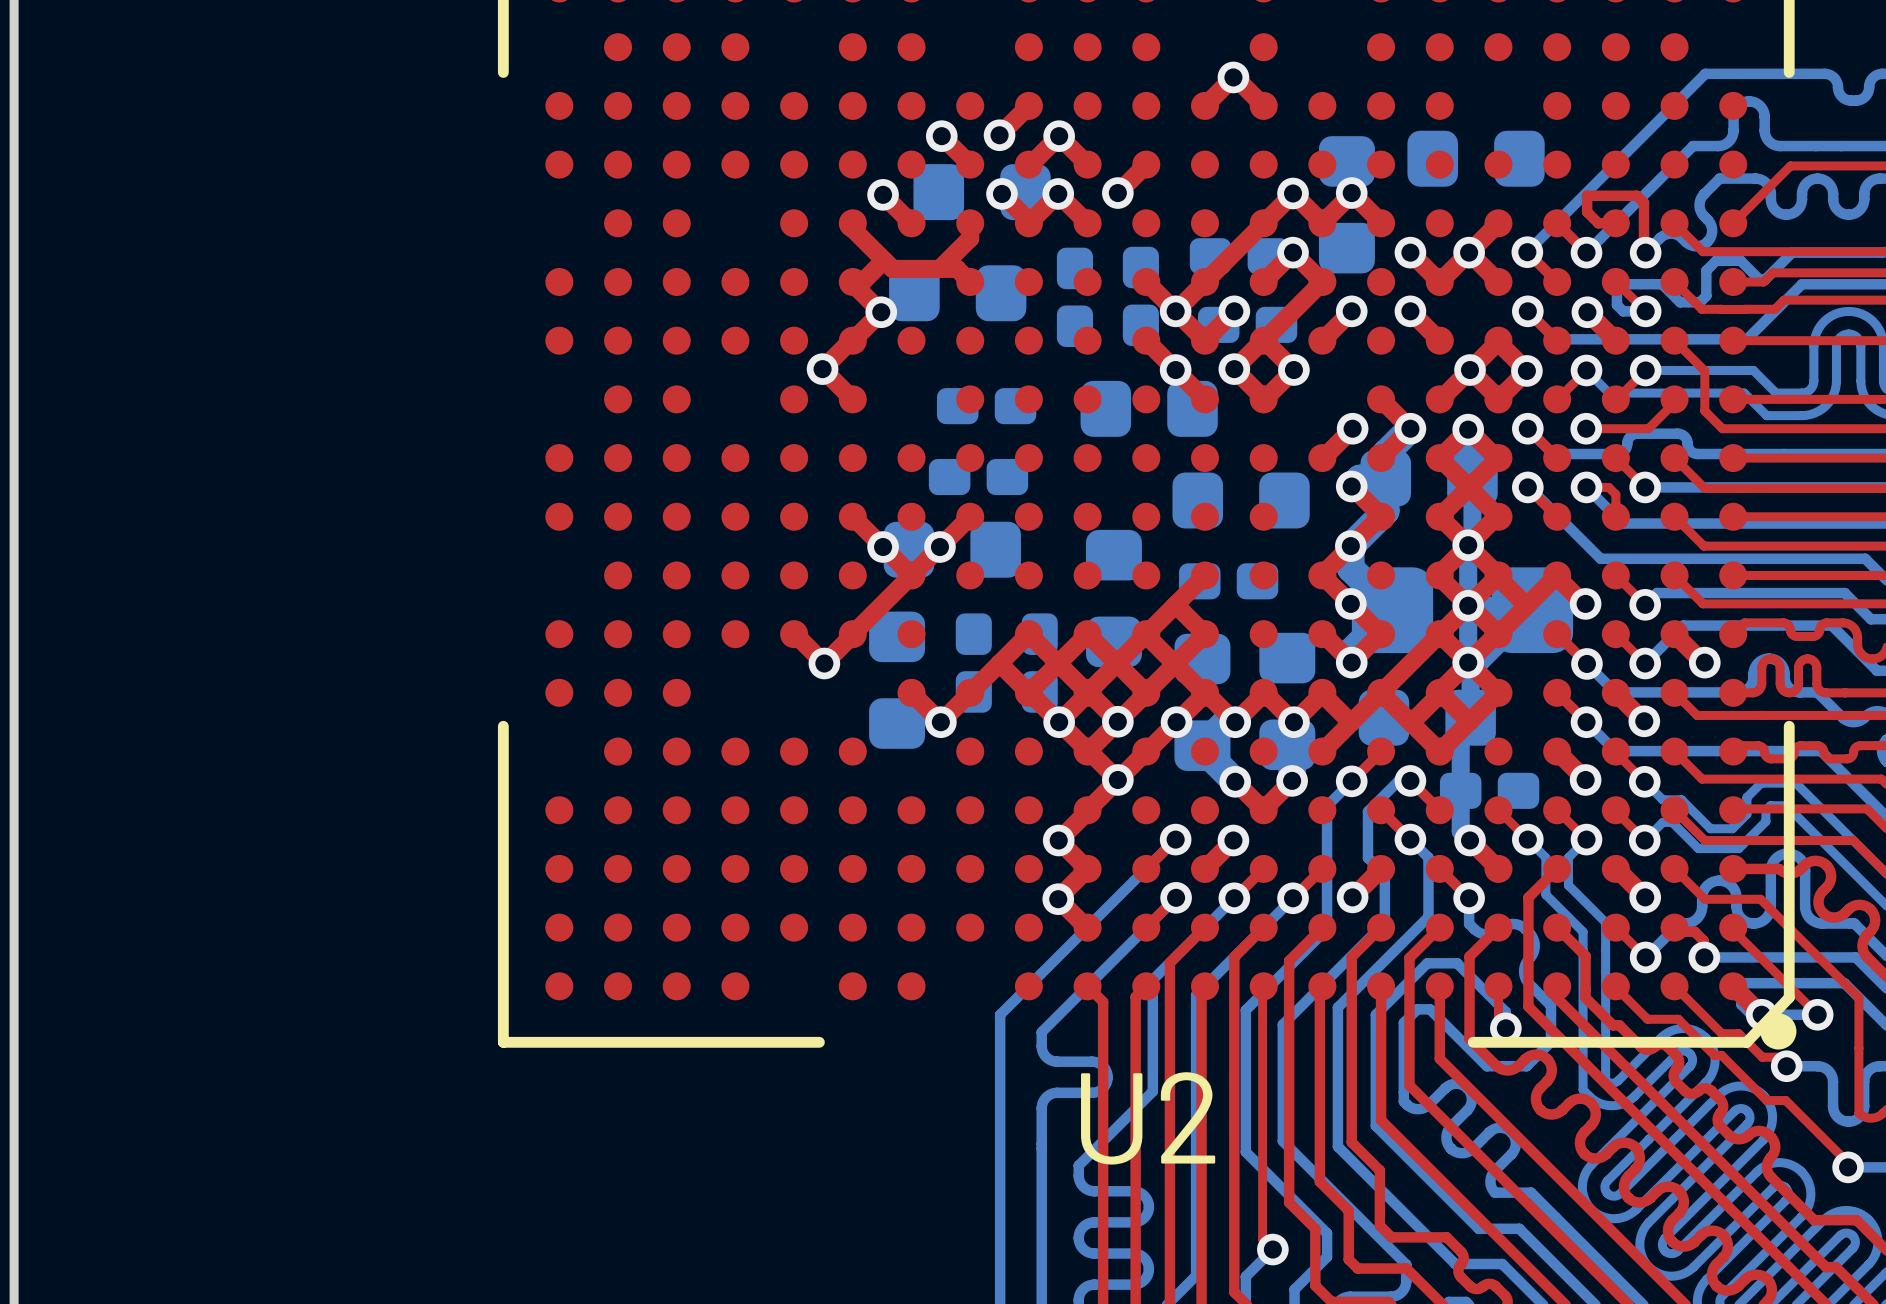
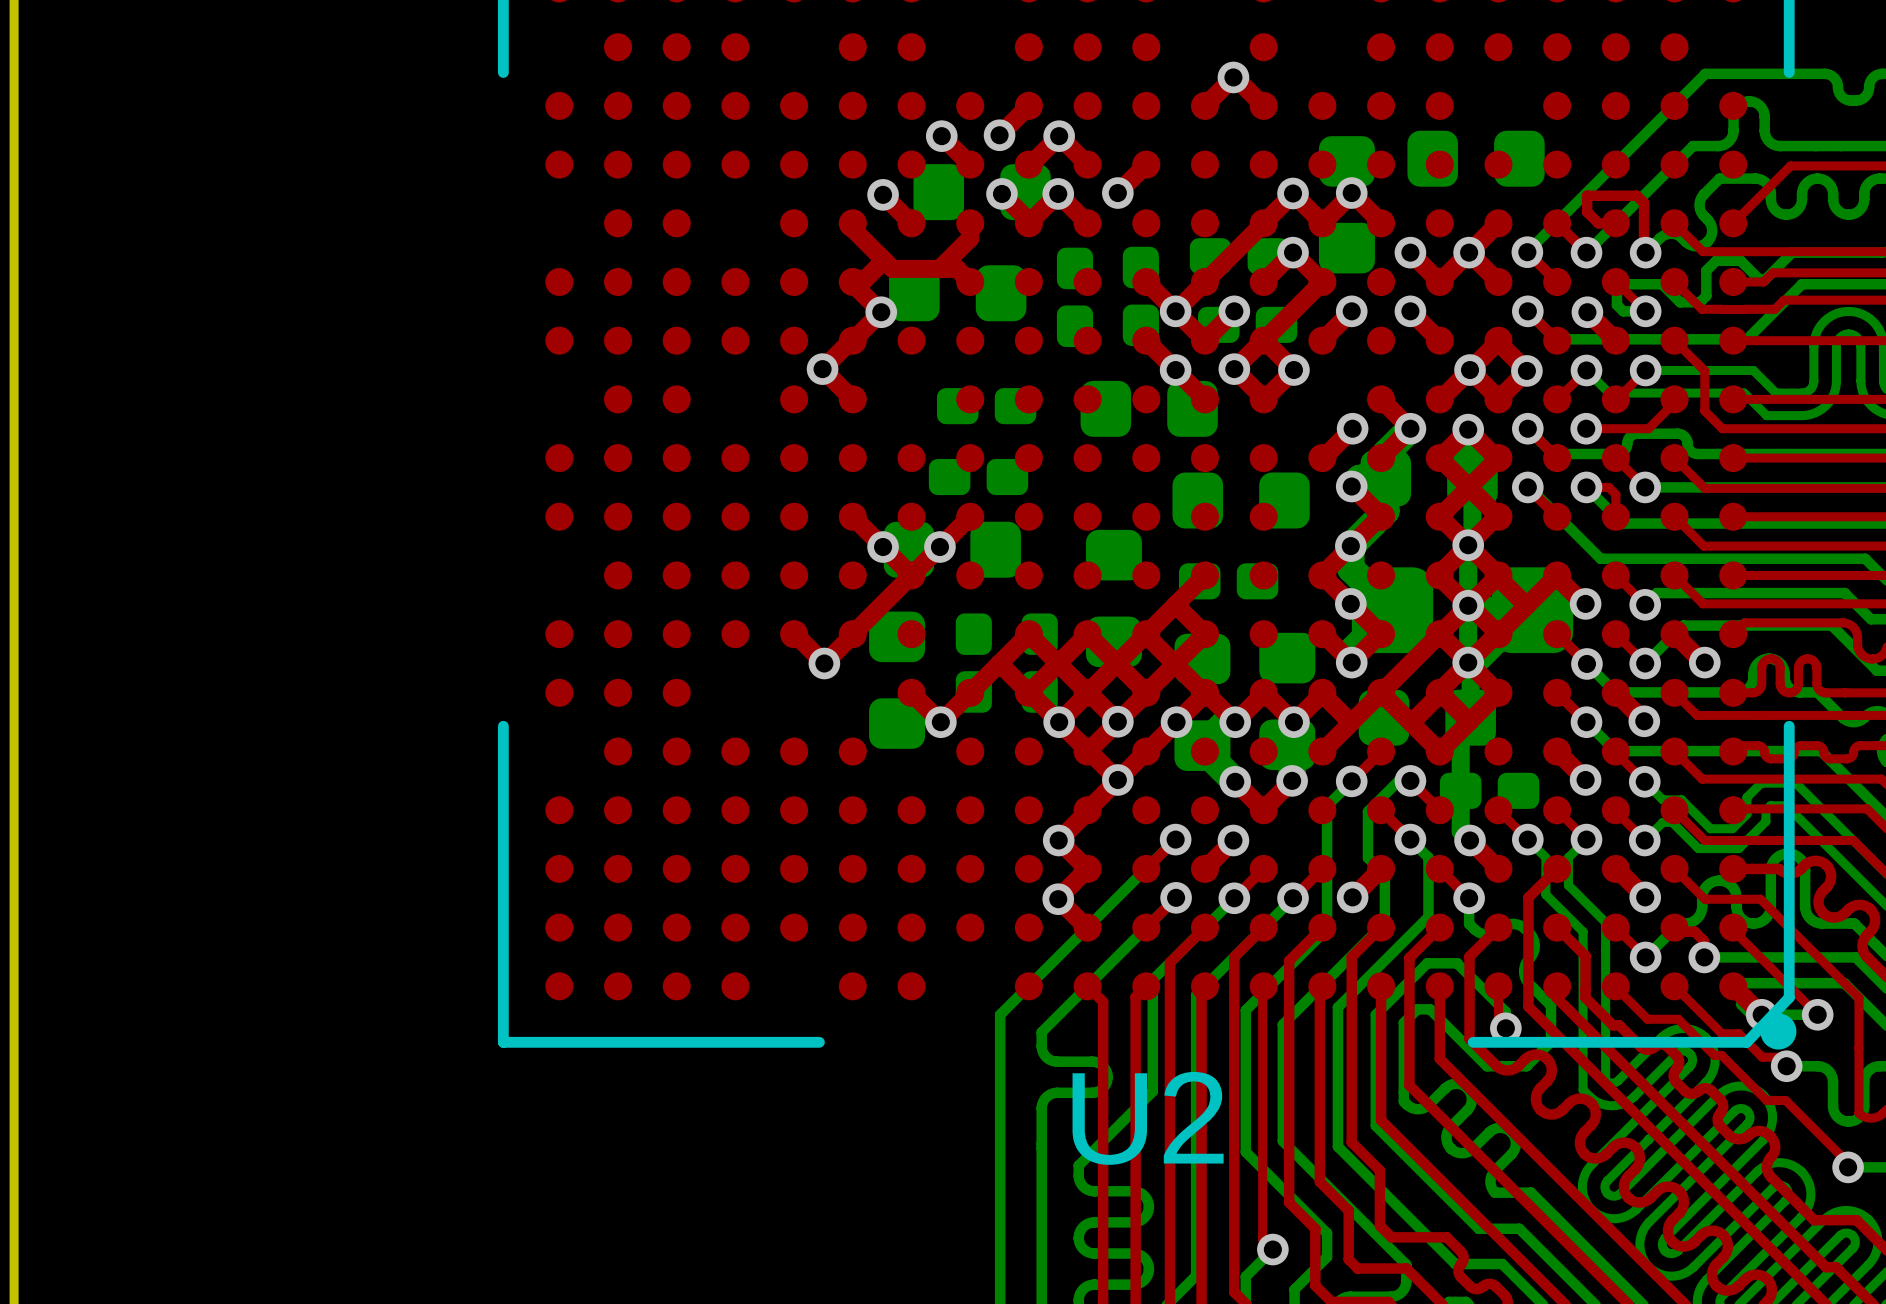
top track: (1783, 622) (1788, 625) (1792, 634) (1796, 636) (1815, 635) (1818, 633) (1821, 625) (1826, 622) -> (1783, 622) (1826, 622)

